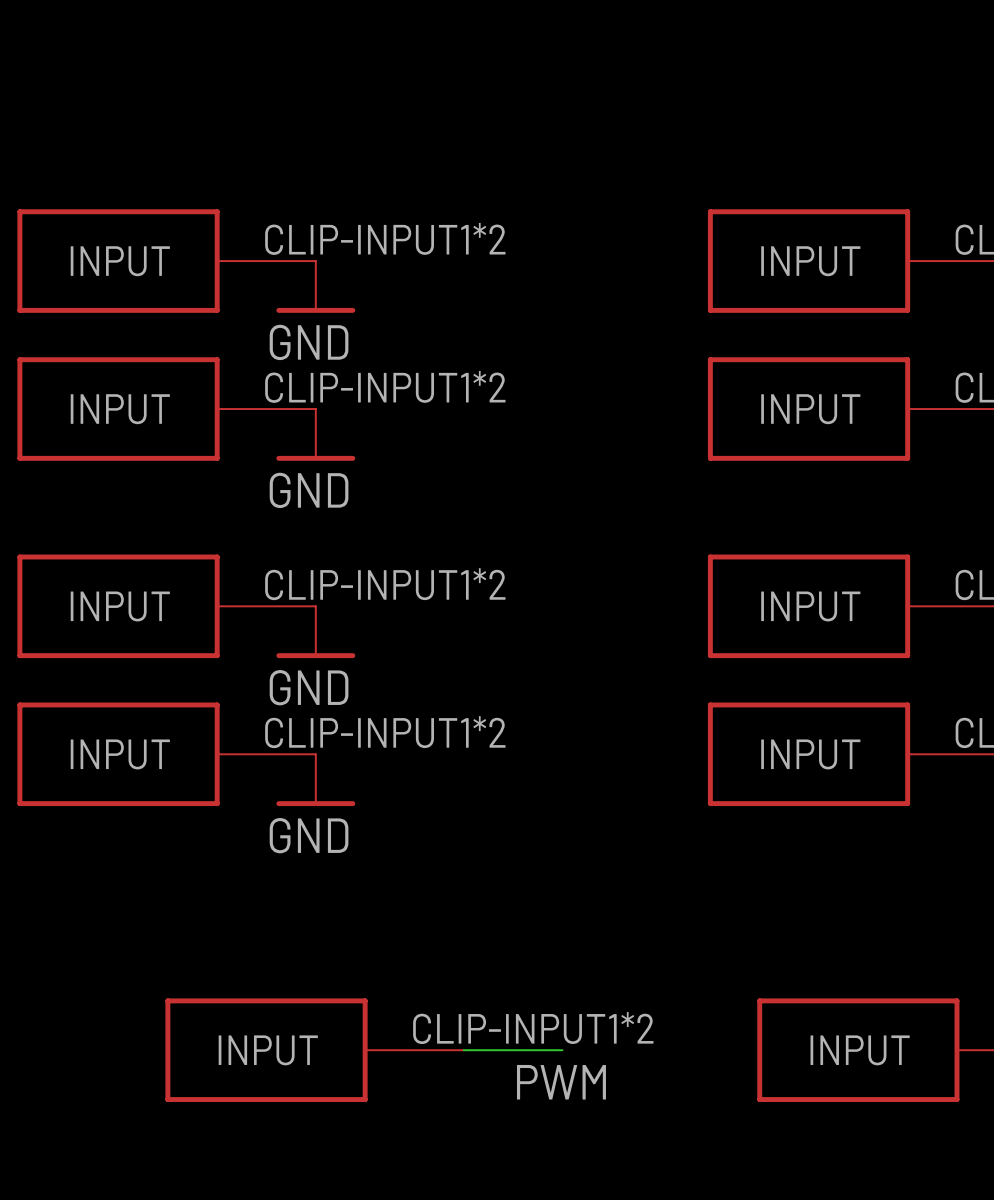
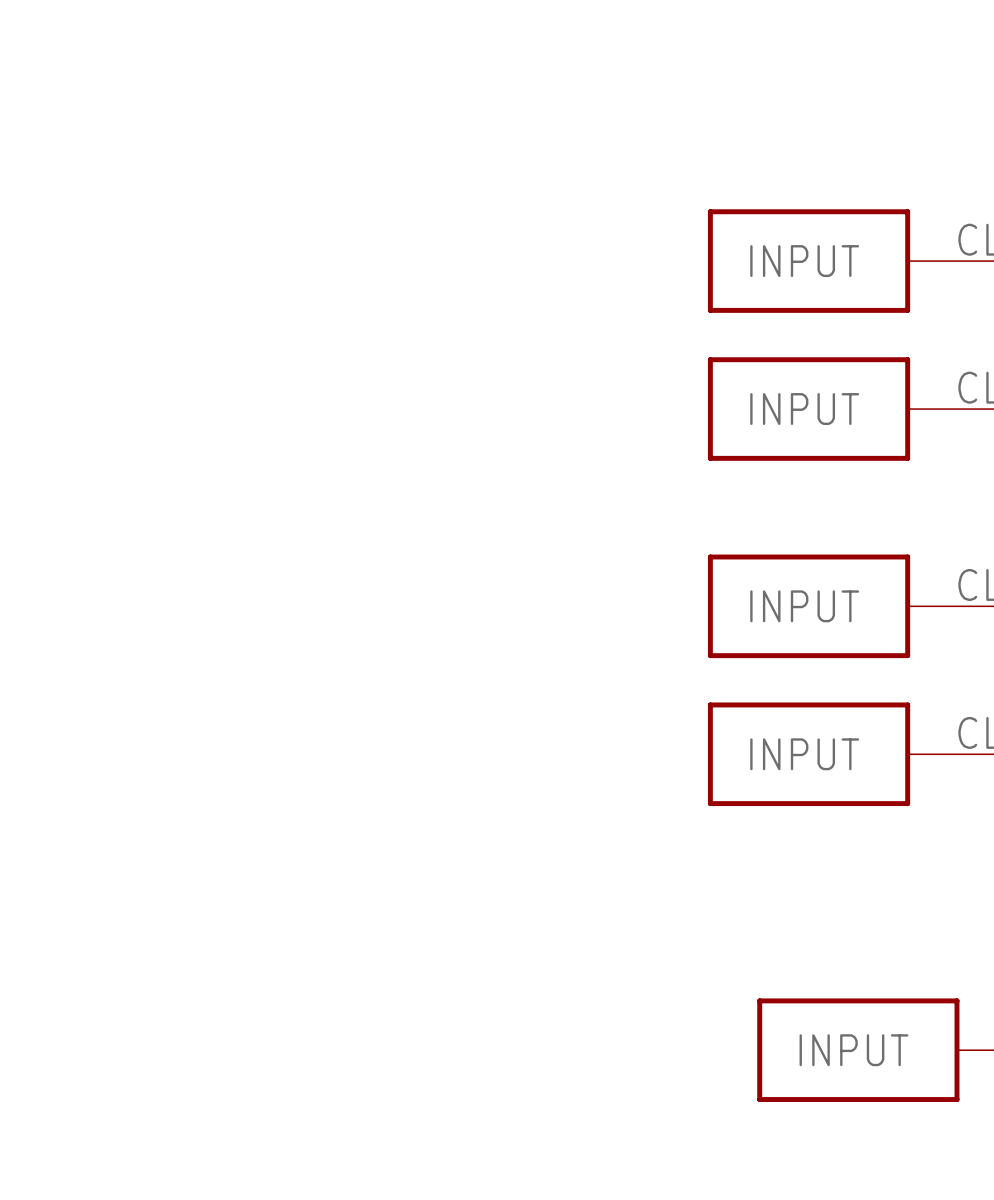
part: (166, 261) -> none
power symbol: GND (315, 286) -> none
part: (166, 409) -> none
power symbol: GND (315, 434) -> none
part: (166, 606) -> none
power symbol: GND (315, 632) -> none
part: (166, 754) -> none
power symbol: GND (315, 780) -> none
part: (314, 1050) -> none
wire: (463, 1050) (562, 1050) -> none
label: PWM (561, 1082) -> none

